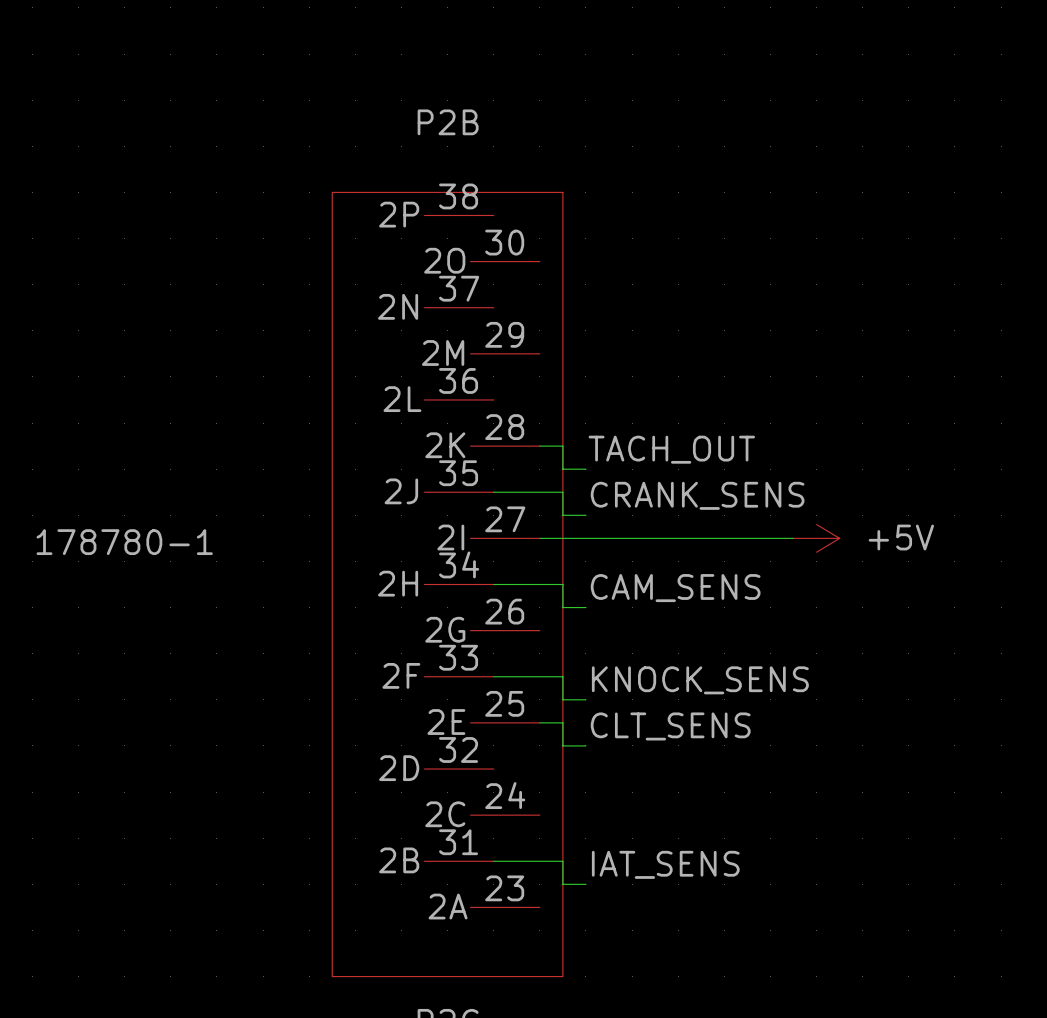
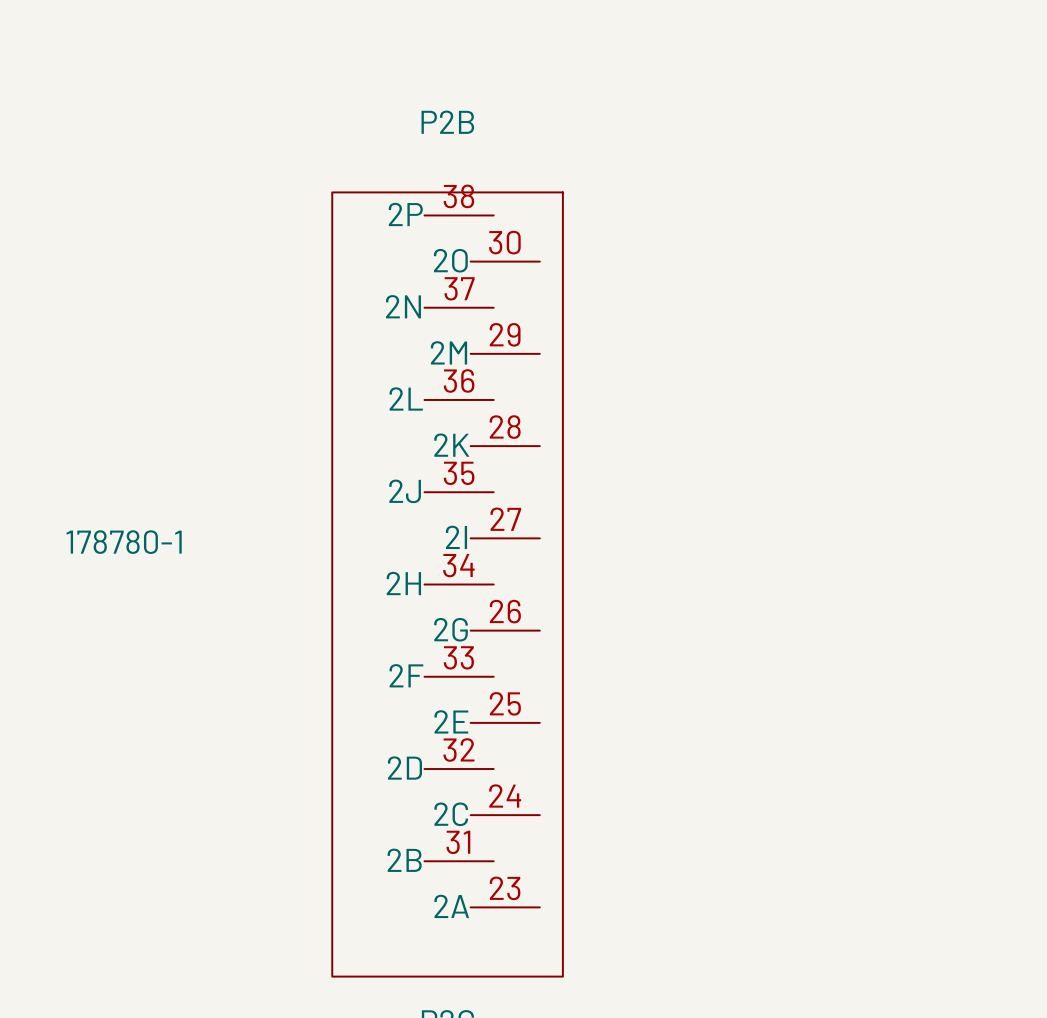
wire: (539, 446) (562, 446) (562, 469) (585, 469) -> none
label: TACH_OUT (671, 449) -> none
wire: (493, 492) (562, 492) (562, 515) (585, 515) -> none
label: CRANK_SENS (697, 495) -> none
wire: (539, 538) (793, 538) -> none
power symbol: +5V (816, 538) -> none
wire: (493, 584) (562, 584) (562, 607) (585, 607) -> none
label: CAM_SENS (675, 588) -> none
wire: (493, 676) (562, 676) (562, 699) (585, 699) -> none
label: KNOCK_SENS (700, 680) -> none
wire: (539, 722) (562, 722) (562, 745) (585, 745) -> none
label: CLT_SENS (670, 726) -> none
wire: (493, 861) (562, 861) (562, 884) (585, 884) -> none
label: IAT_SENS (665, 864) -> none

